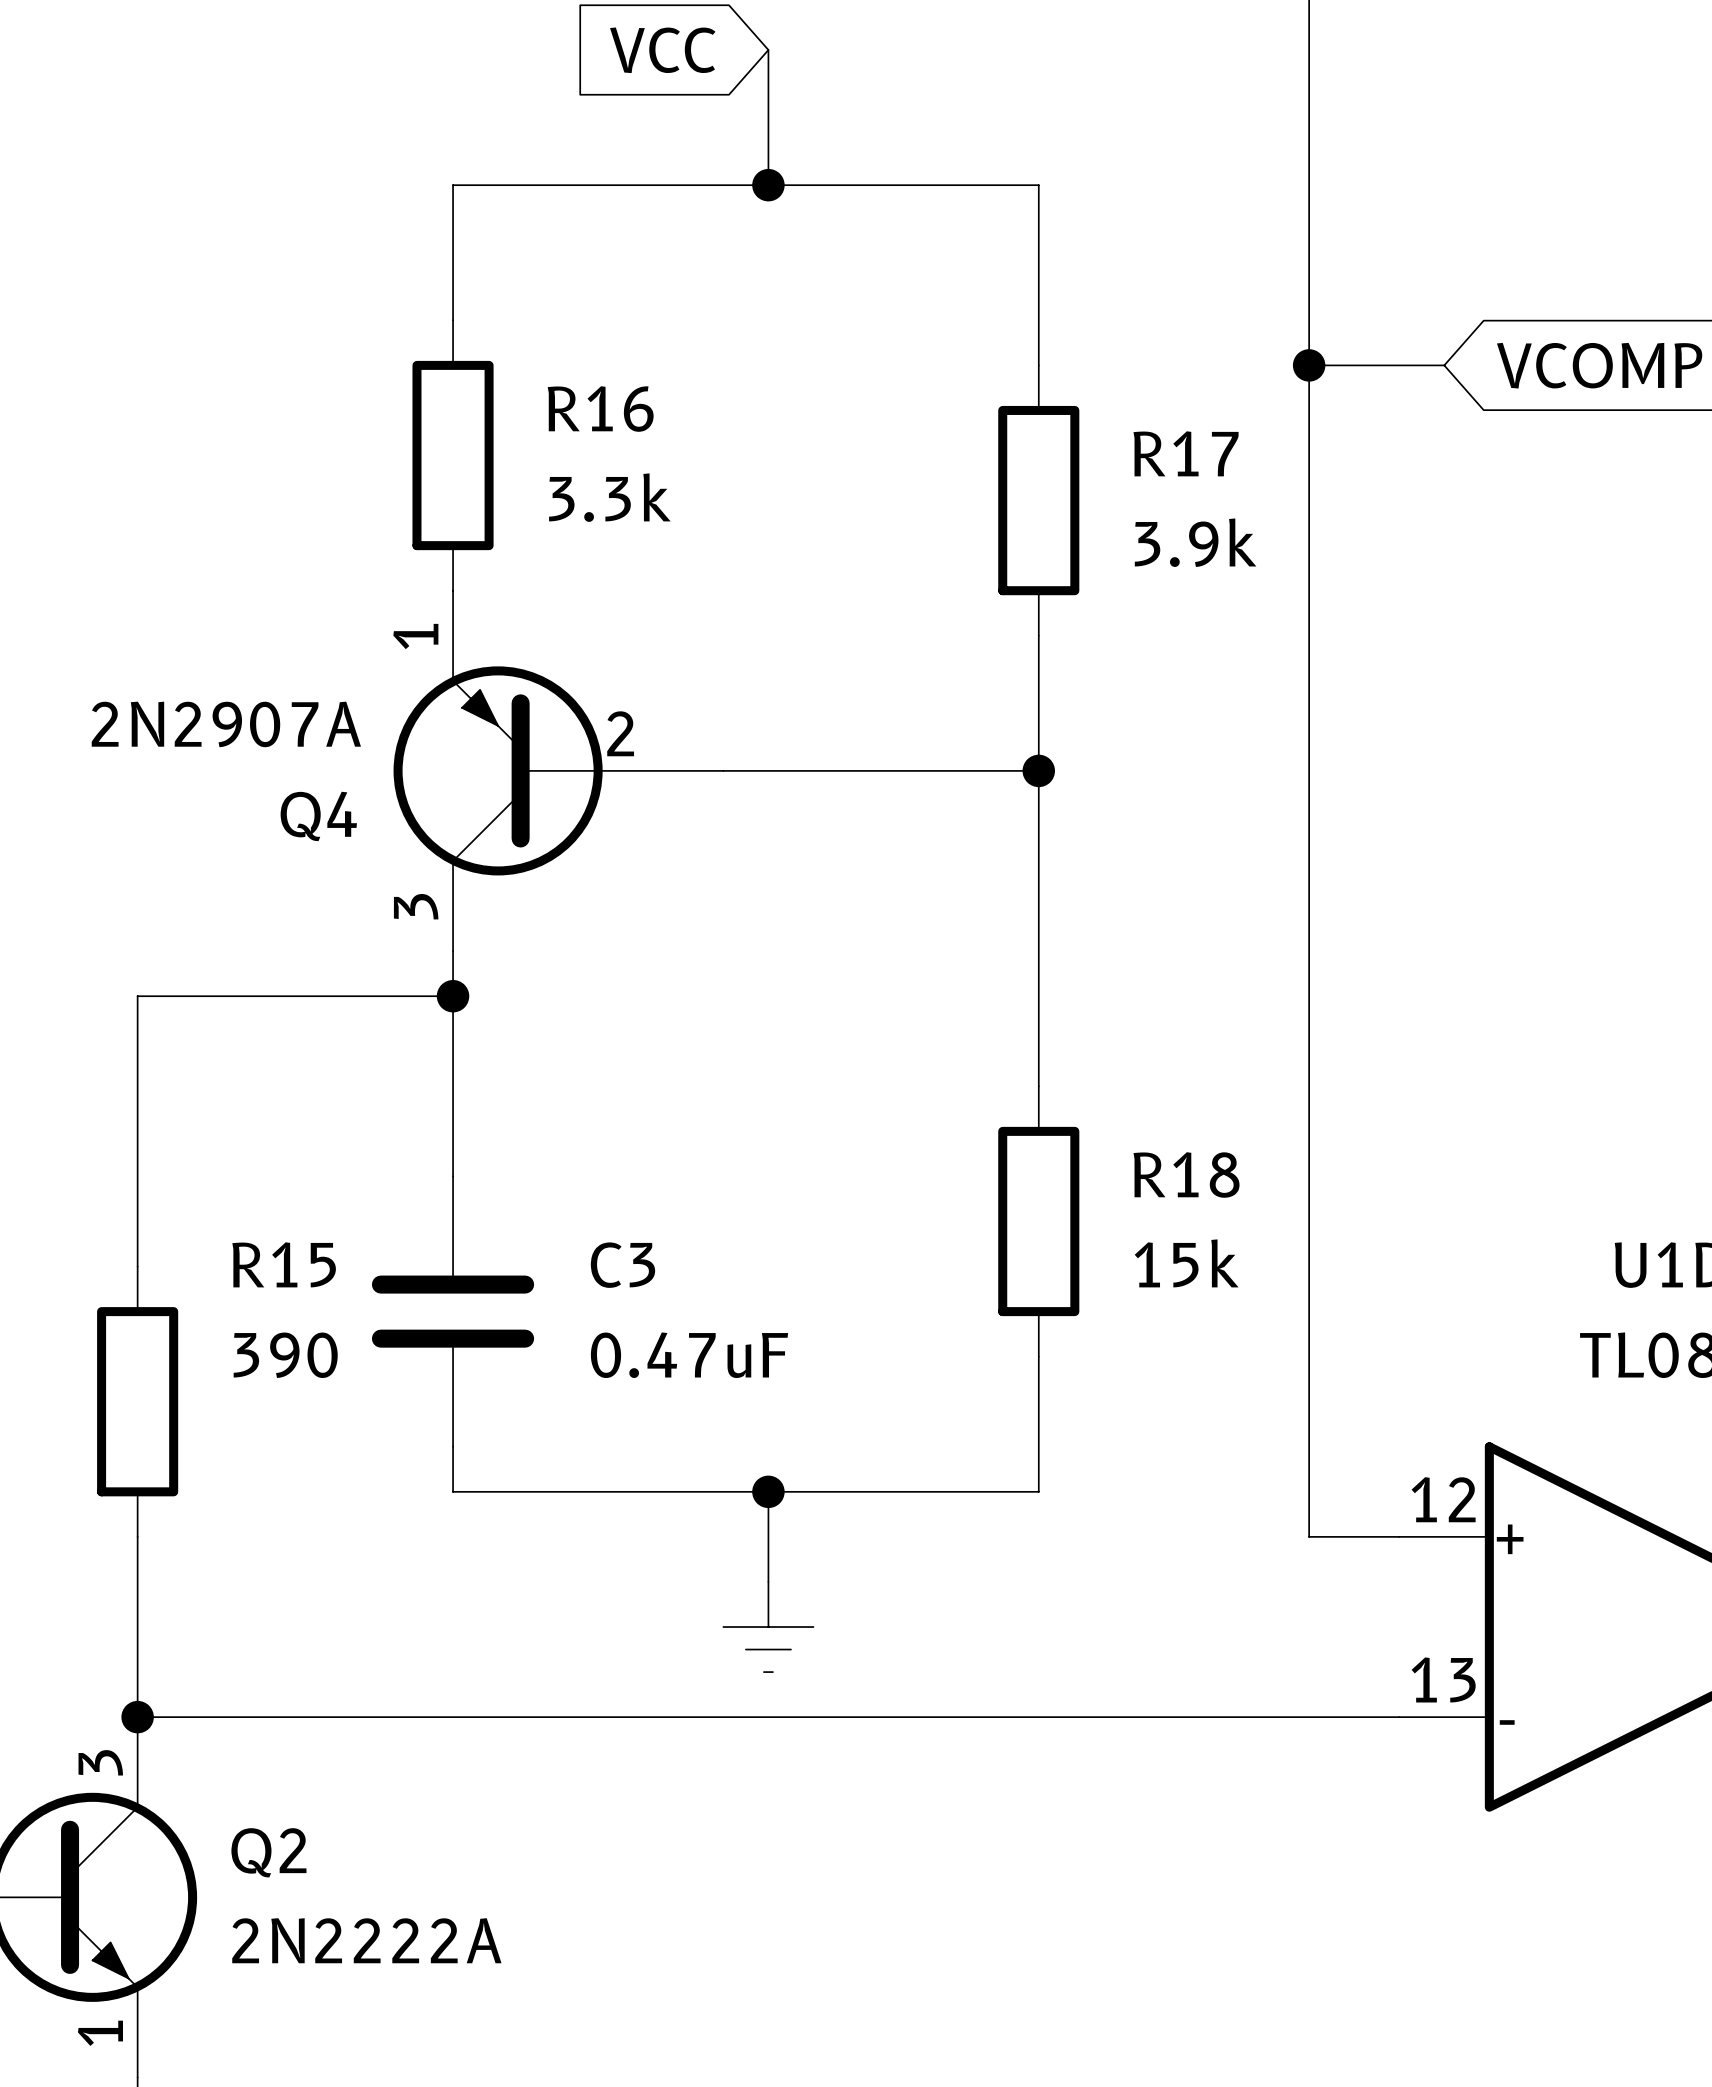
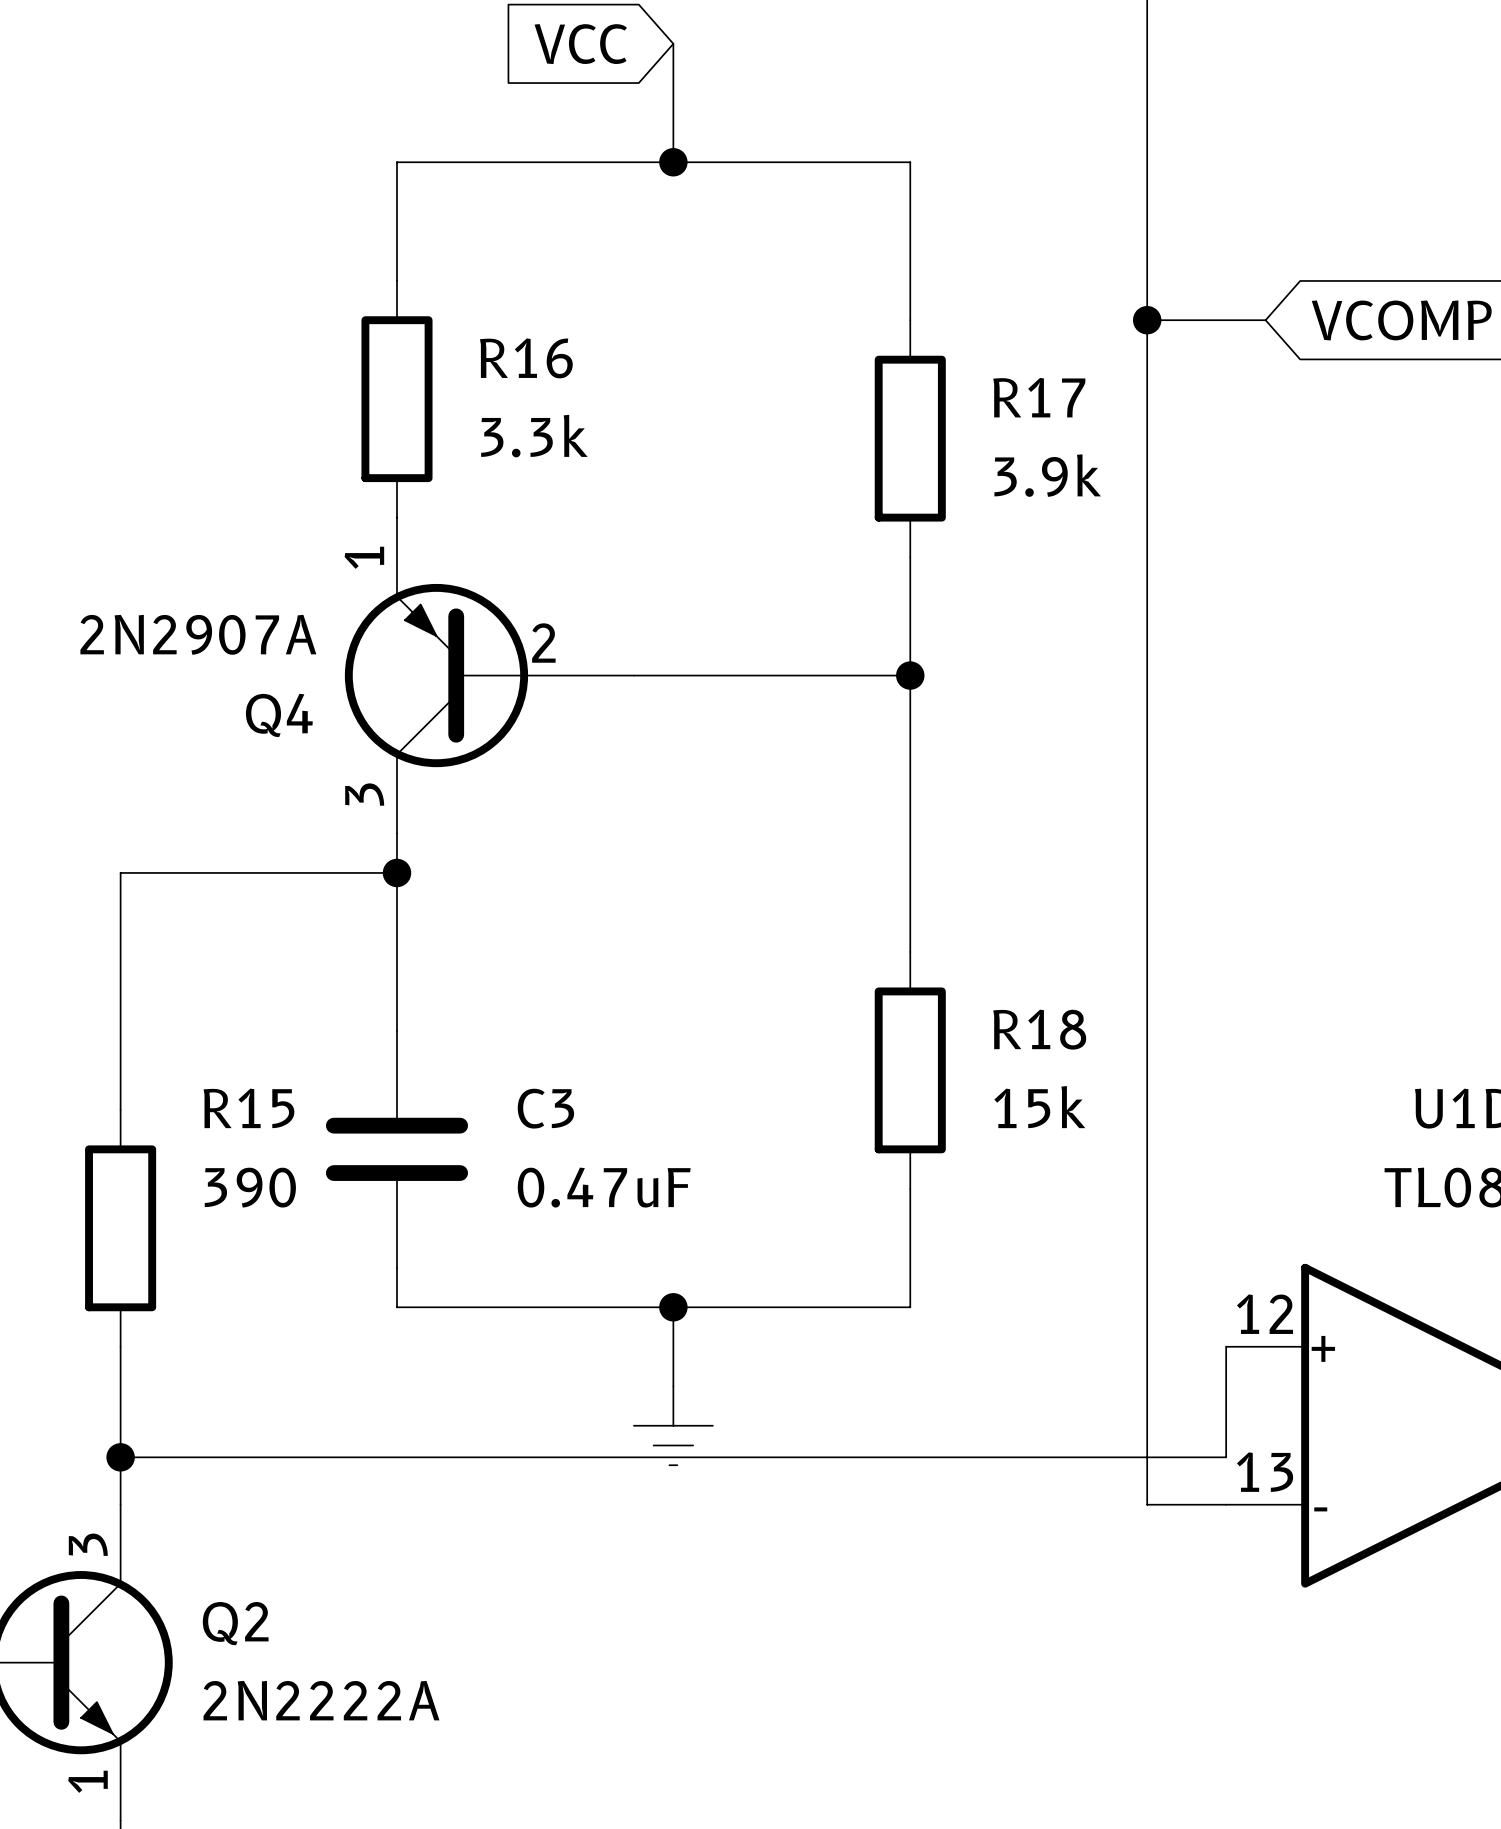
wire: (1309, 1536) (1399, 1536) -> (1147, 1346) (1147, 1504)
wire: none -> (1226, 1346) (1226, 1457) (120, 1457)
wire: (137, 1717) (1309, 1717) -> none
junction position: (137, 1717) -> (120, 1457)

